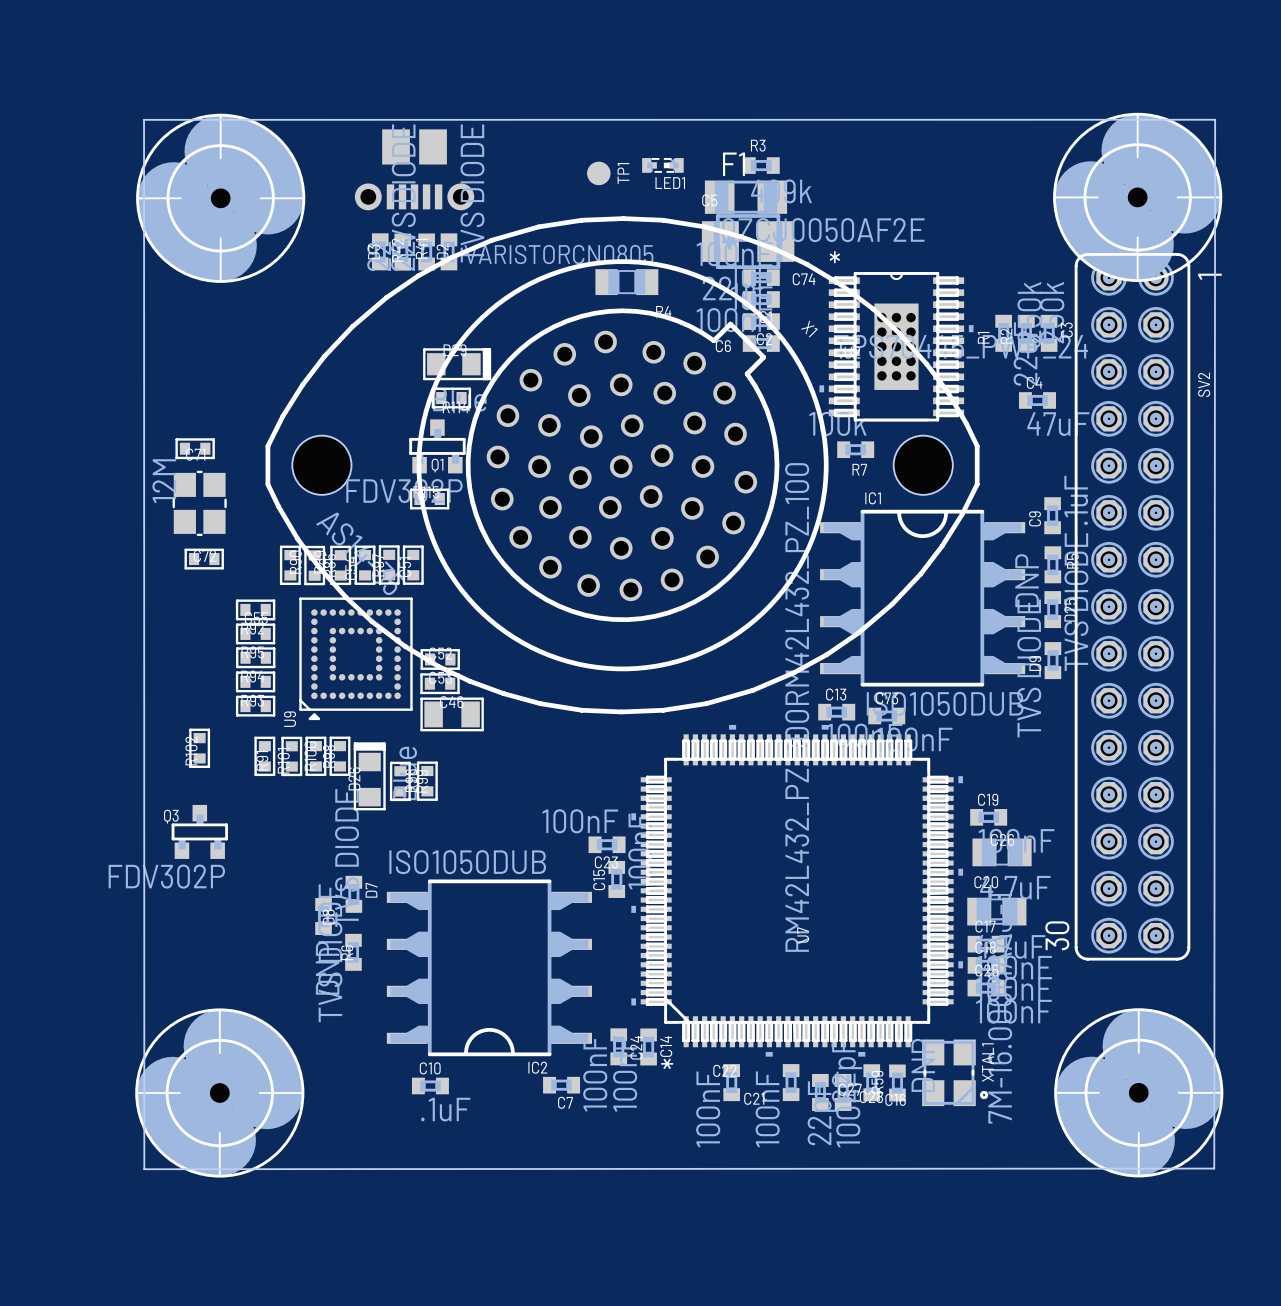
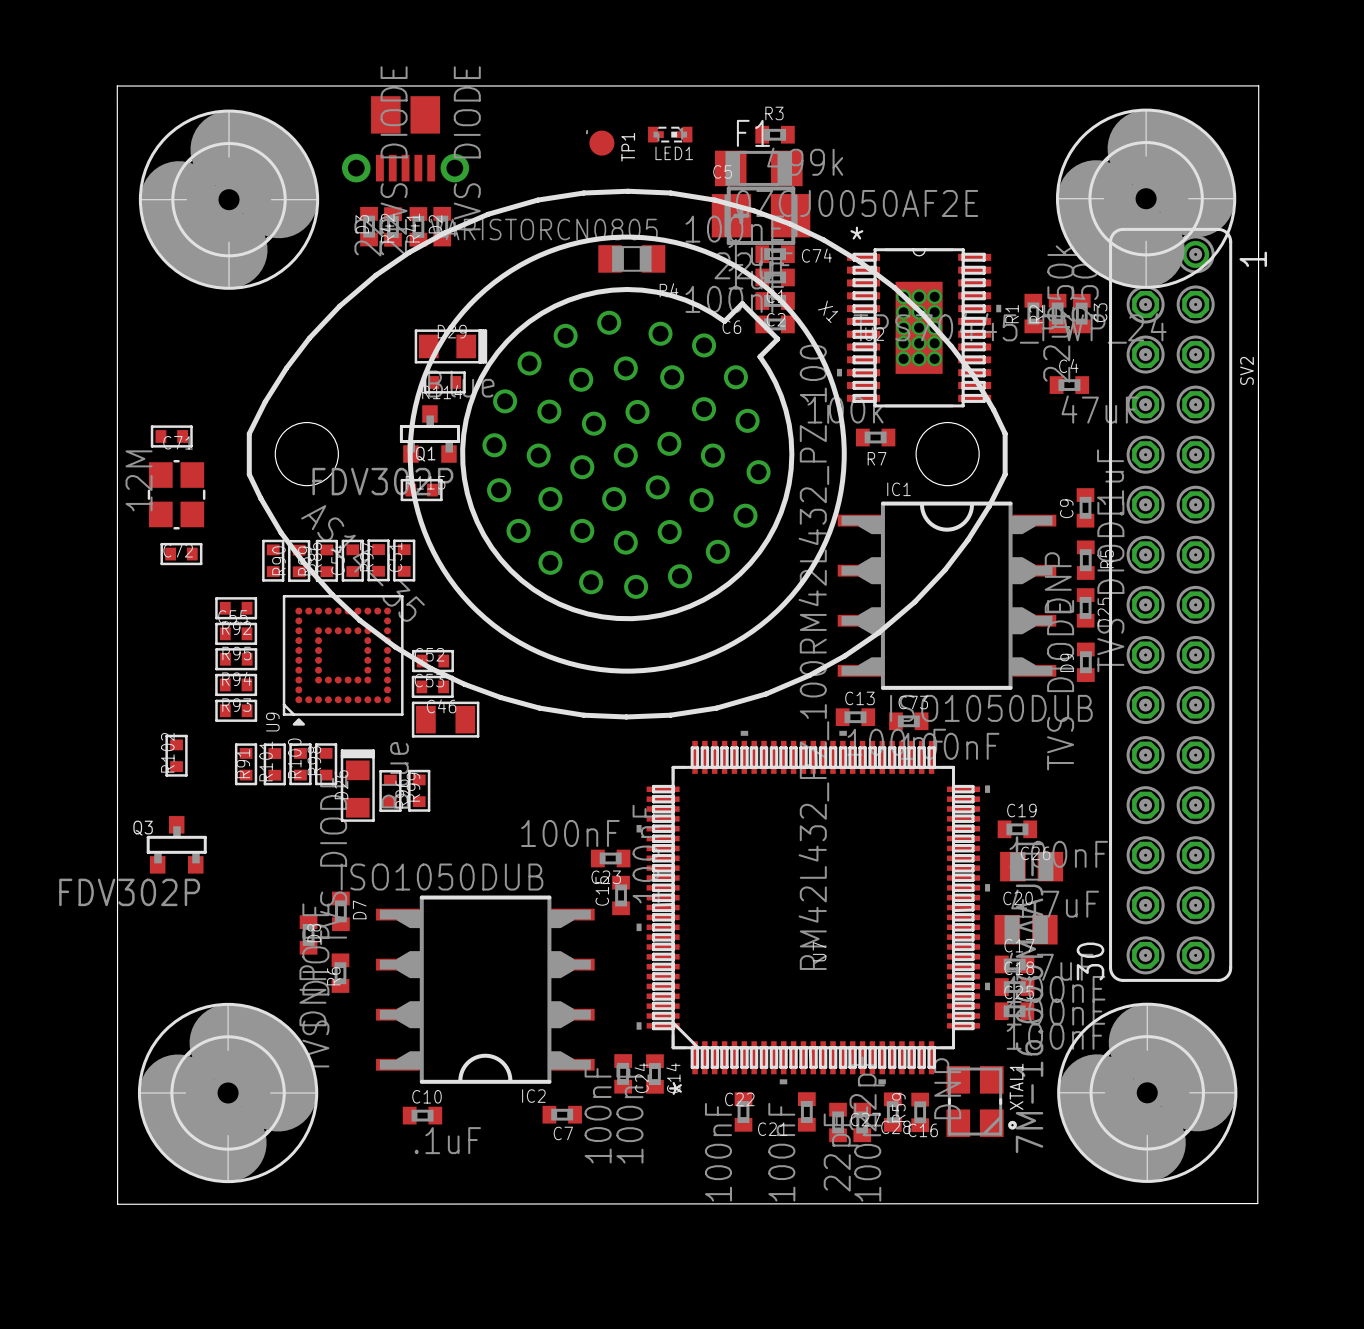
part position: (1137, 197) -> (1146, 198)
part position: (220, 198) -> (229, 199)
part position: (219, 1092) -> (228, 1092)
part position: (1138, 1092) -> (1147, 1092)

